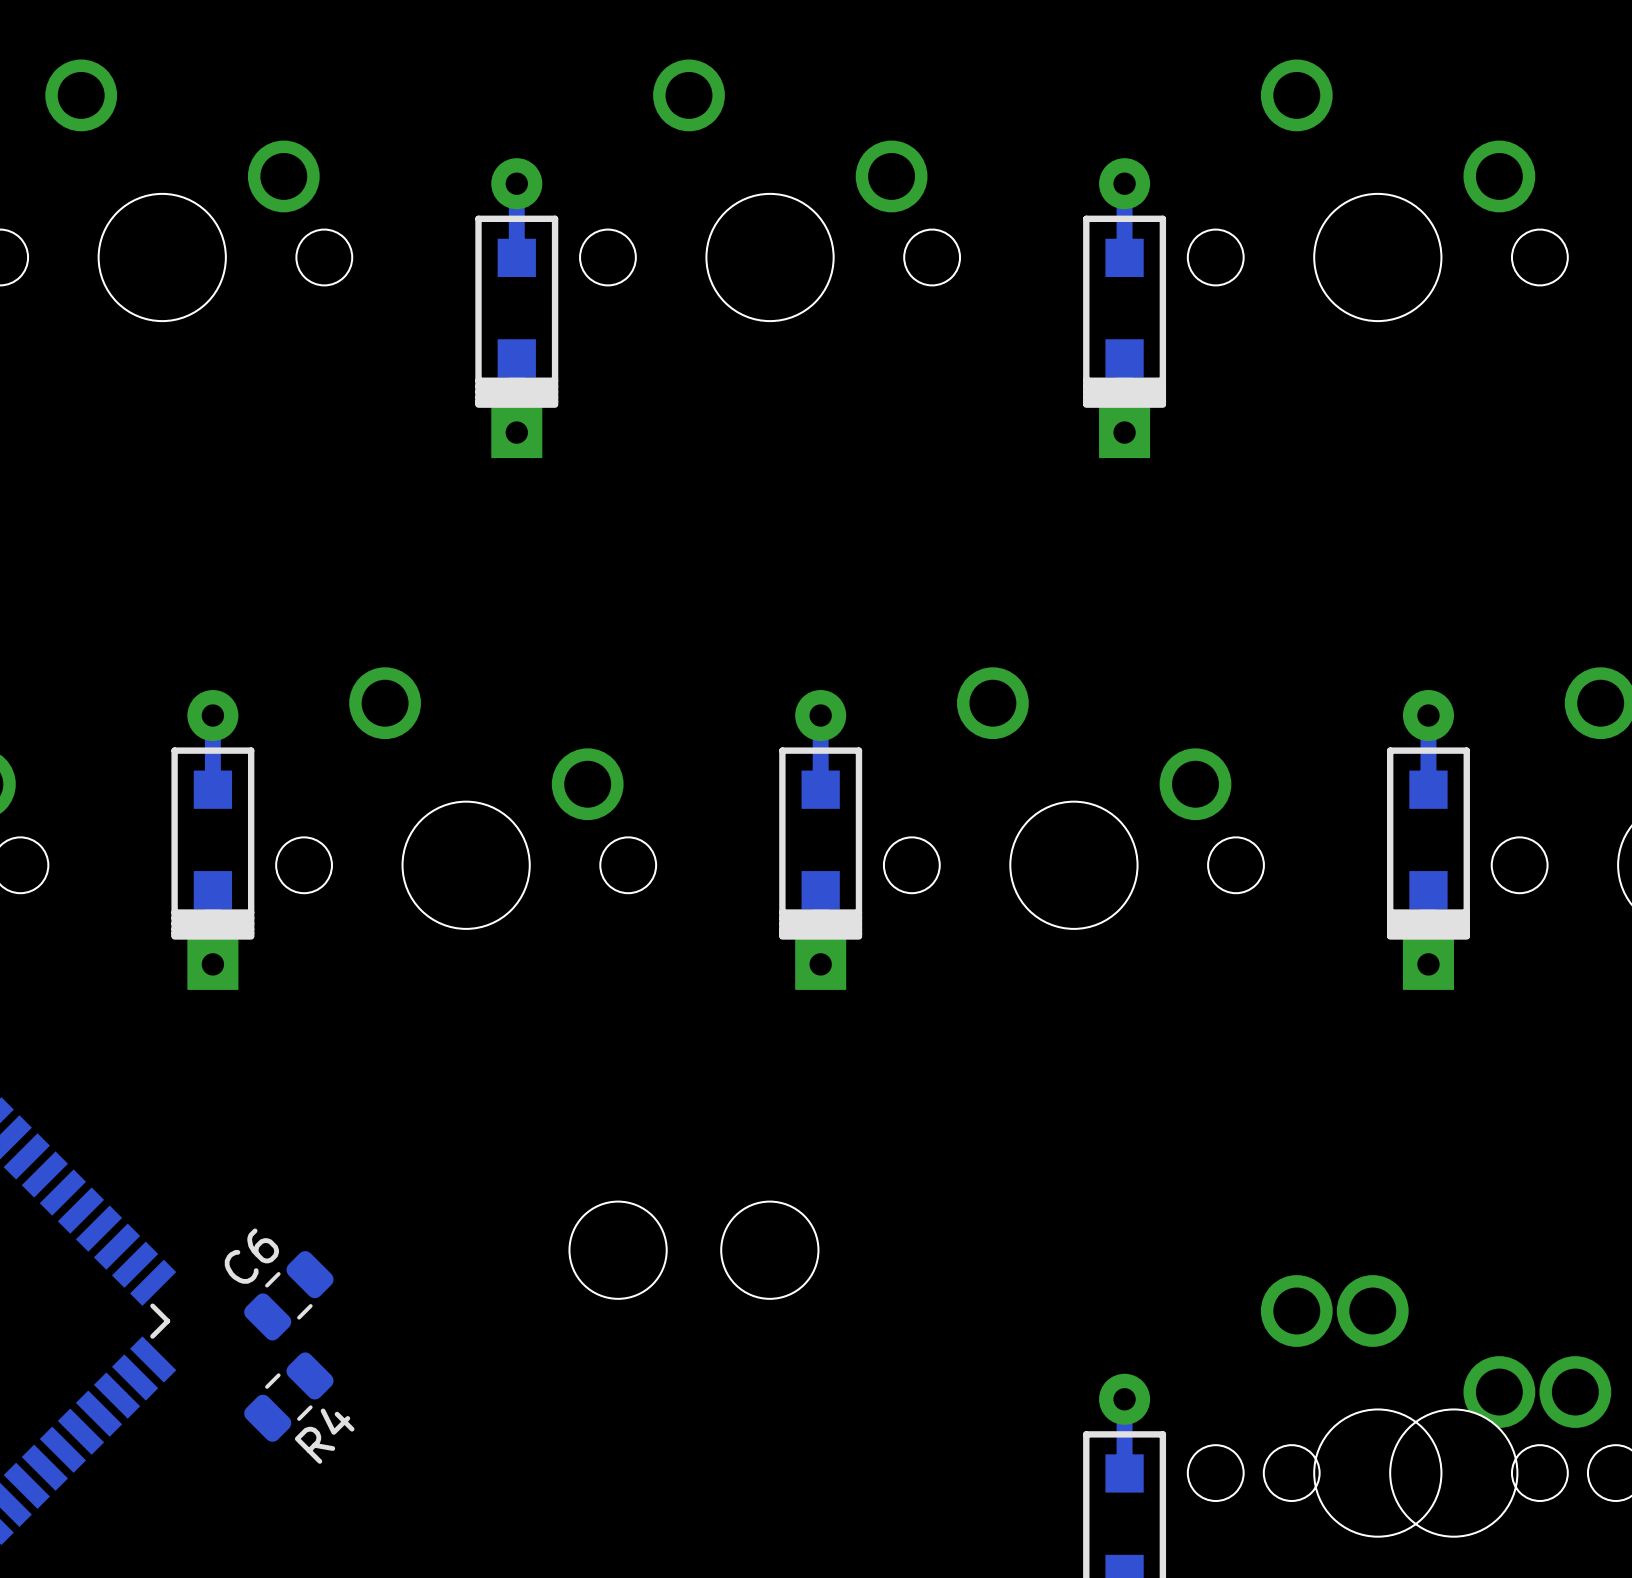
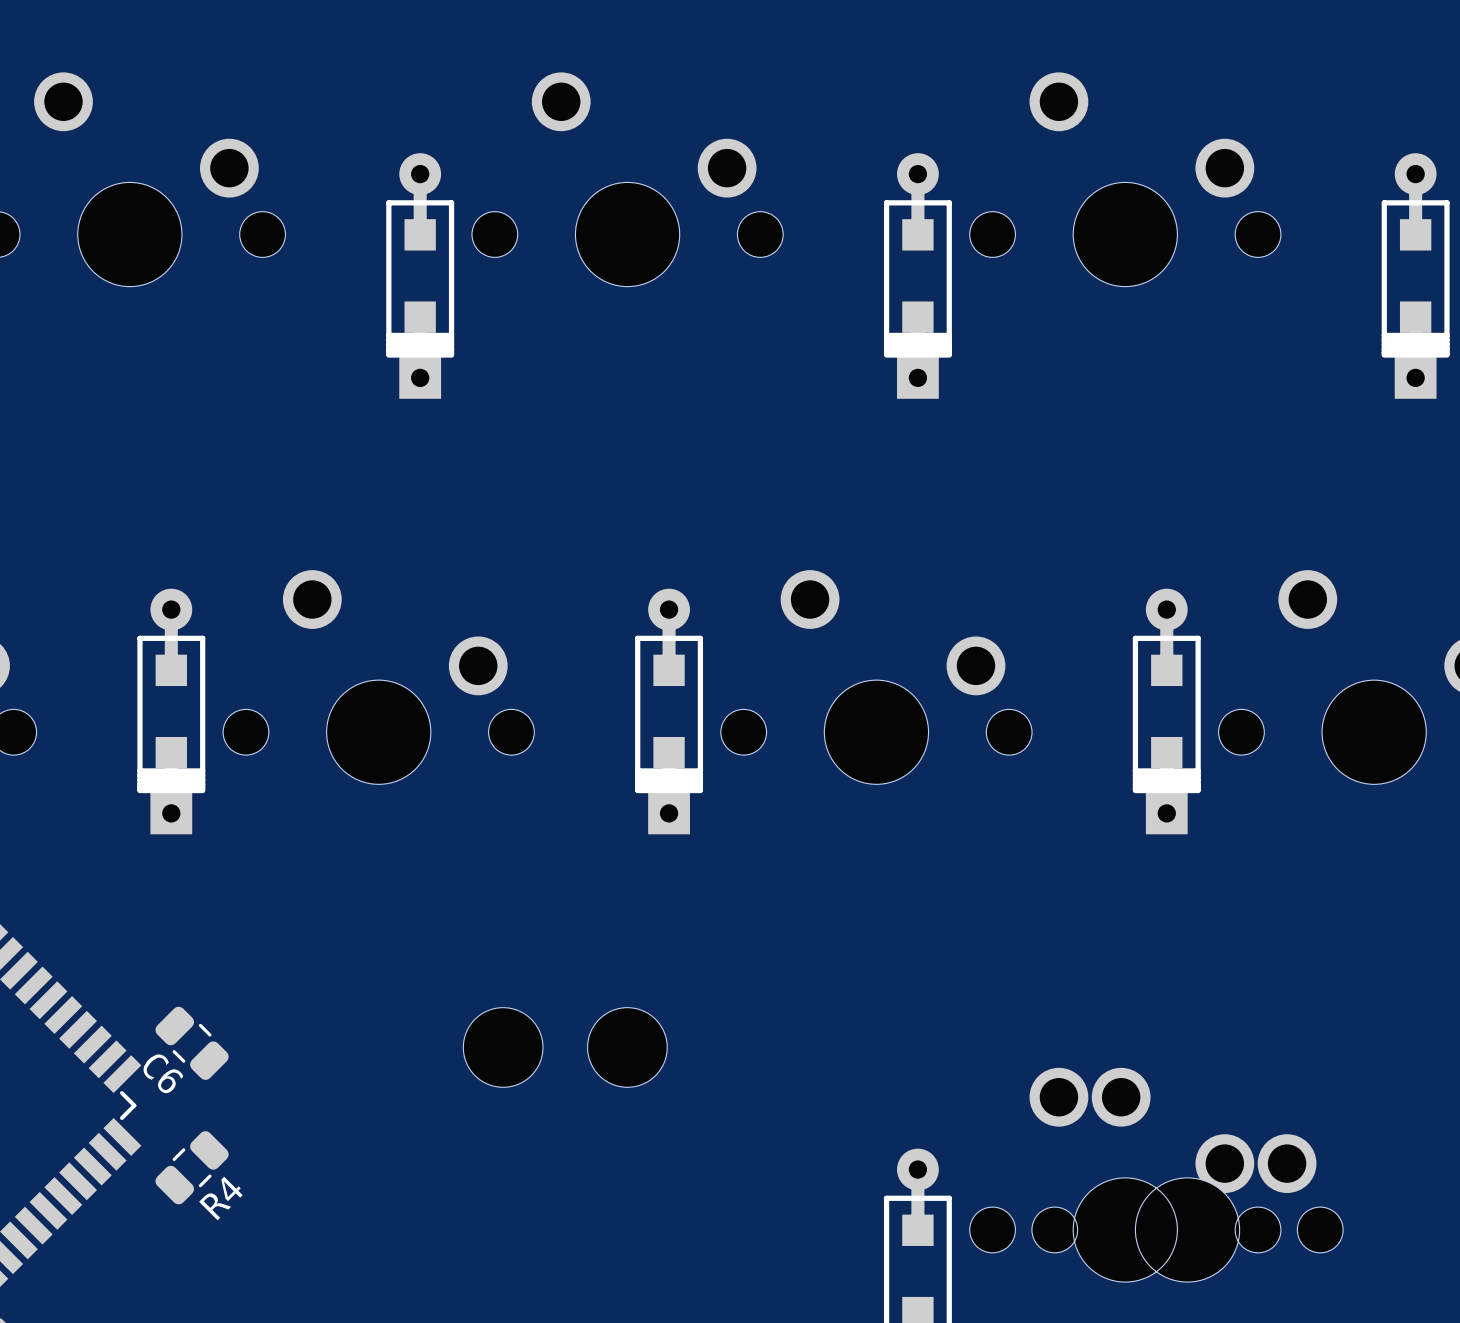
C6 name position: C6 (251, 1256) -> C6 (163, 1073)
C6 rotation: 0° (288, 1295) -> 90° clockwise (192, 1043)
C6 position: (288, 1295) -> (192, 1043)
R4 position: (288, 1397) -> (192, 1167)

